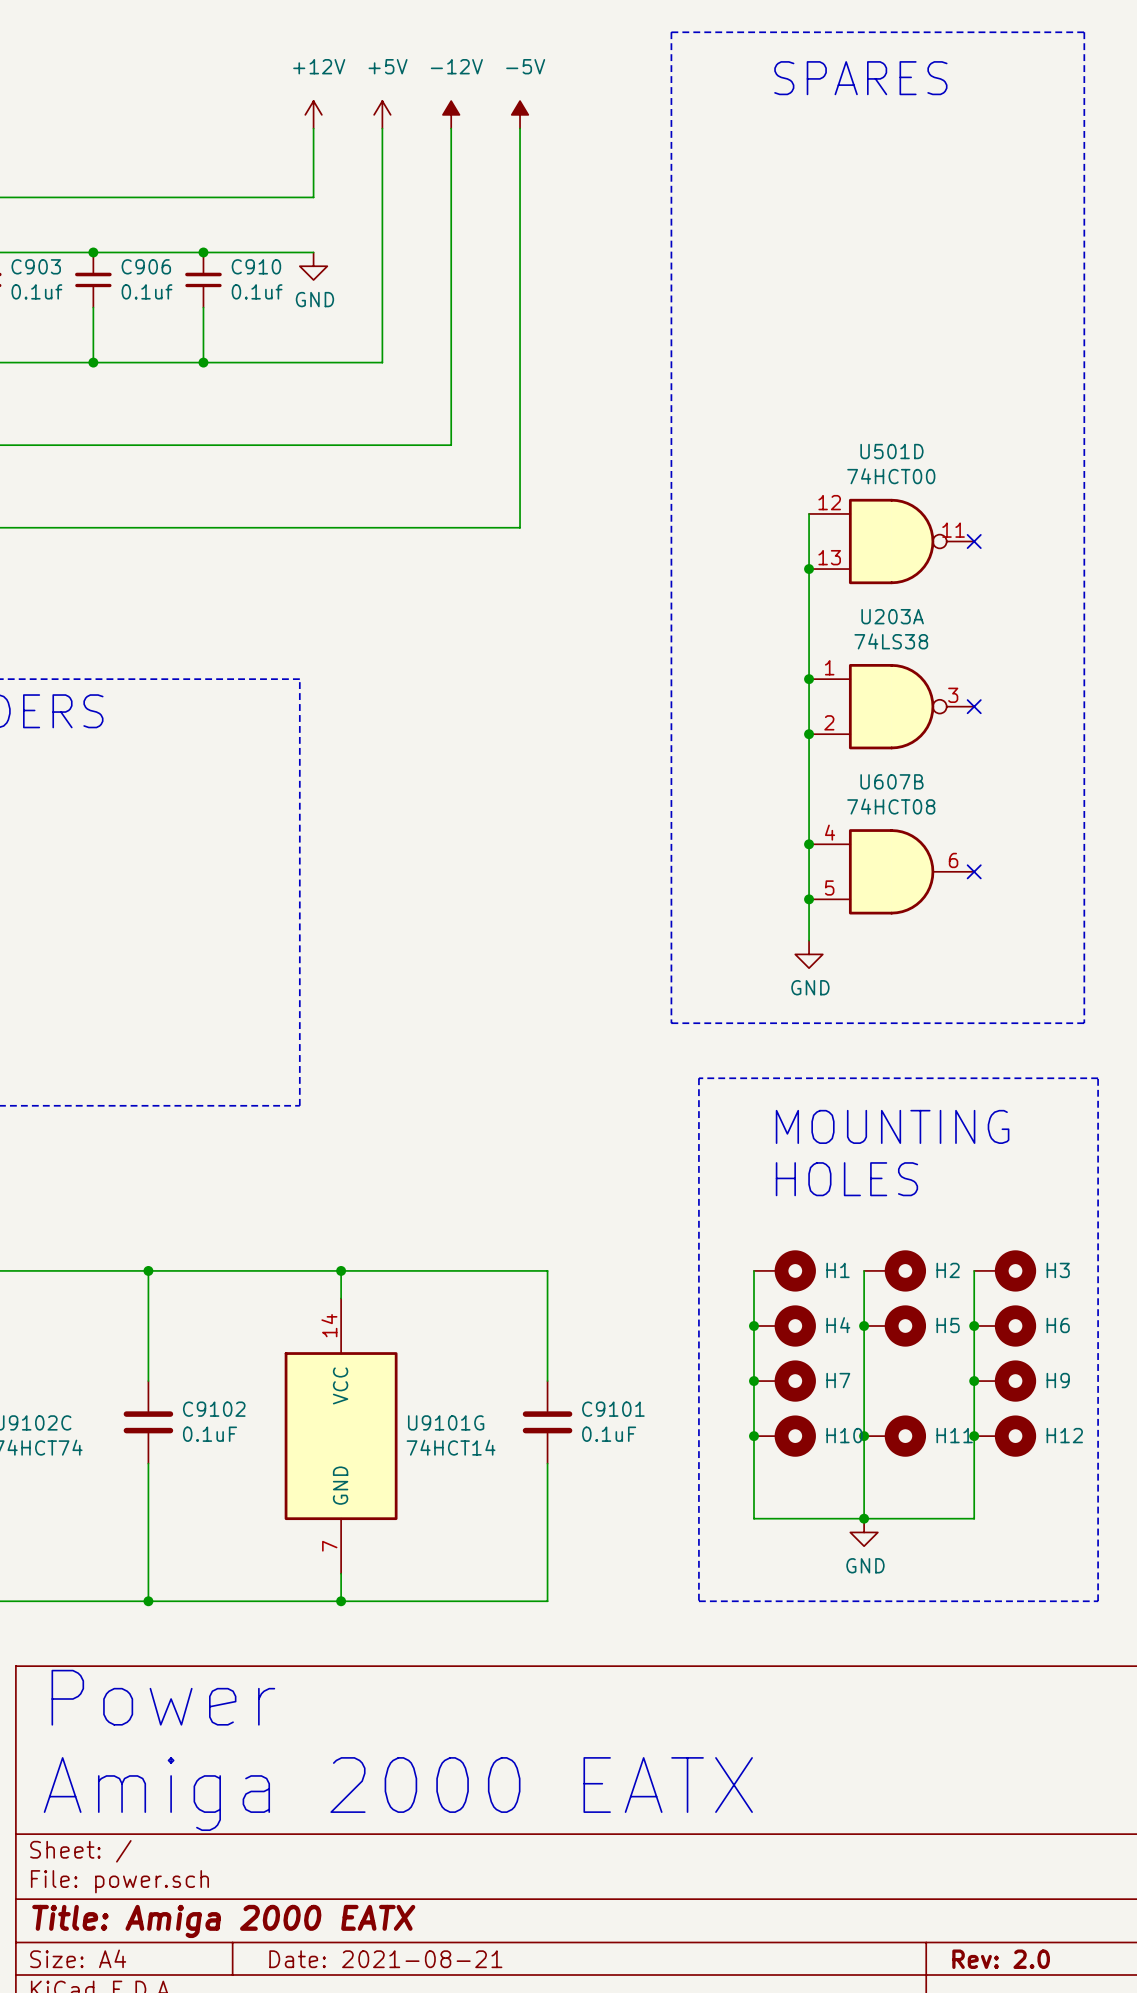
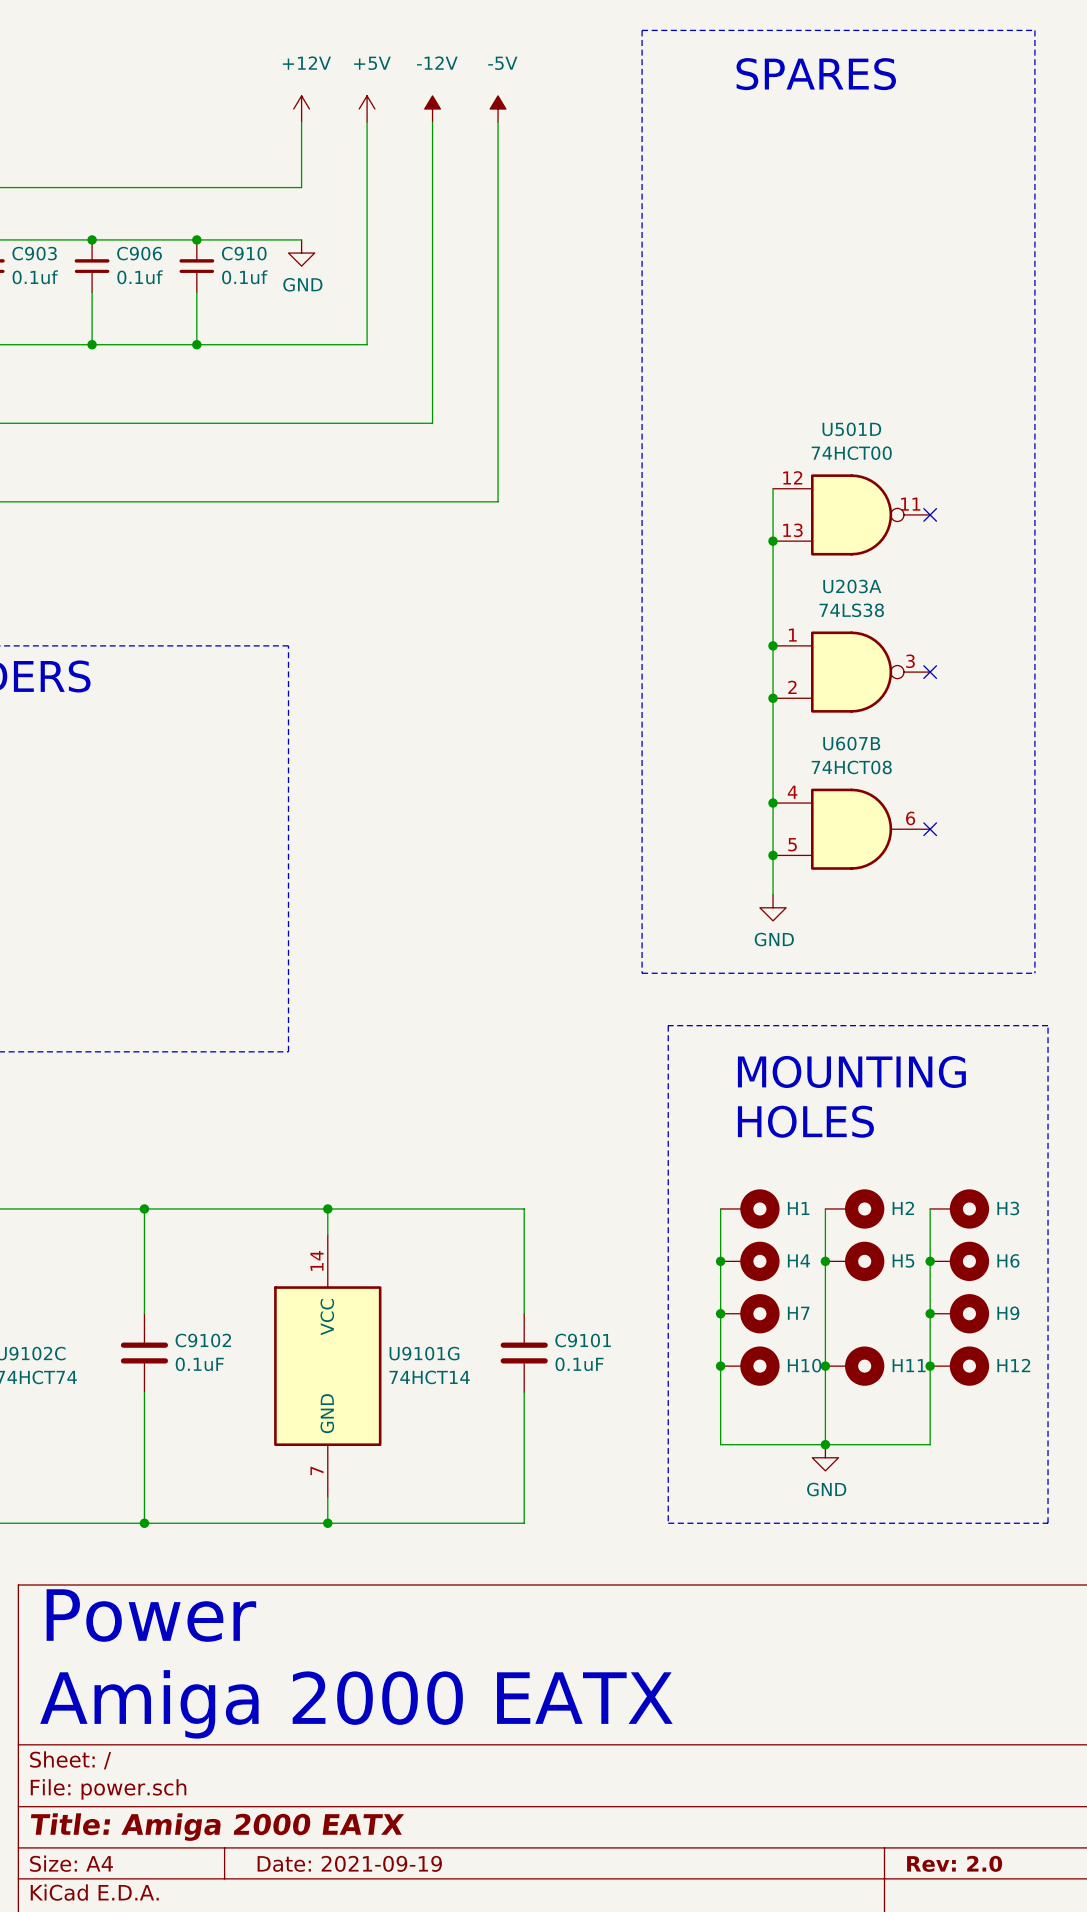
title block: Date: 2021-08-21 (385, 1959) -> Date: 2021-09-19 (349, 1863)

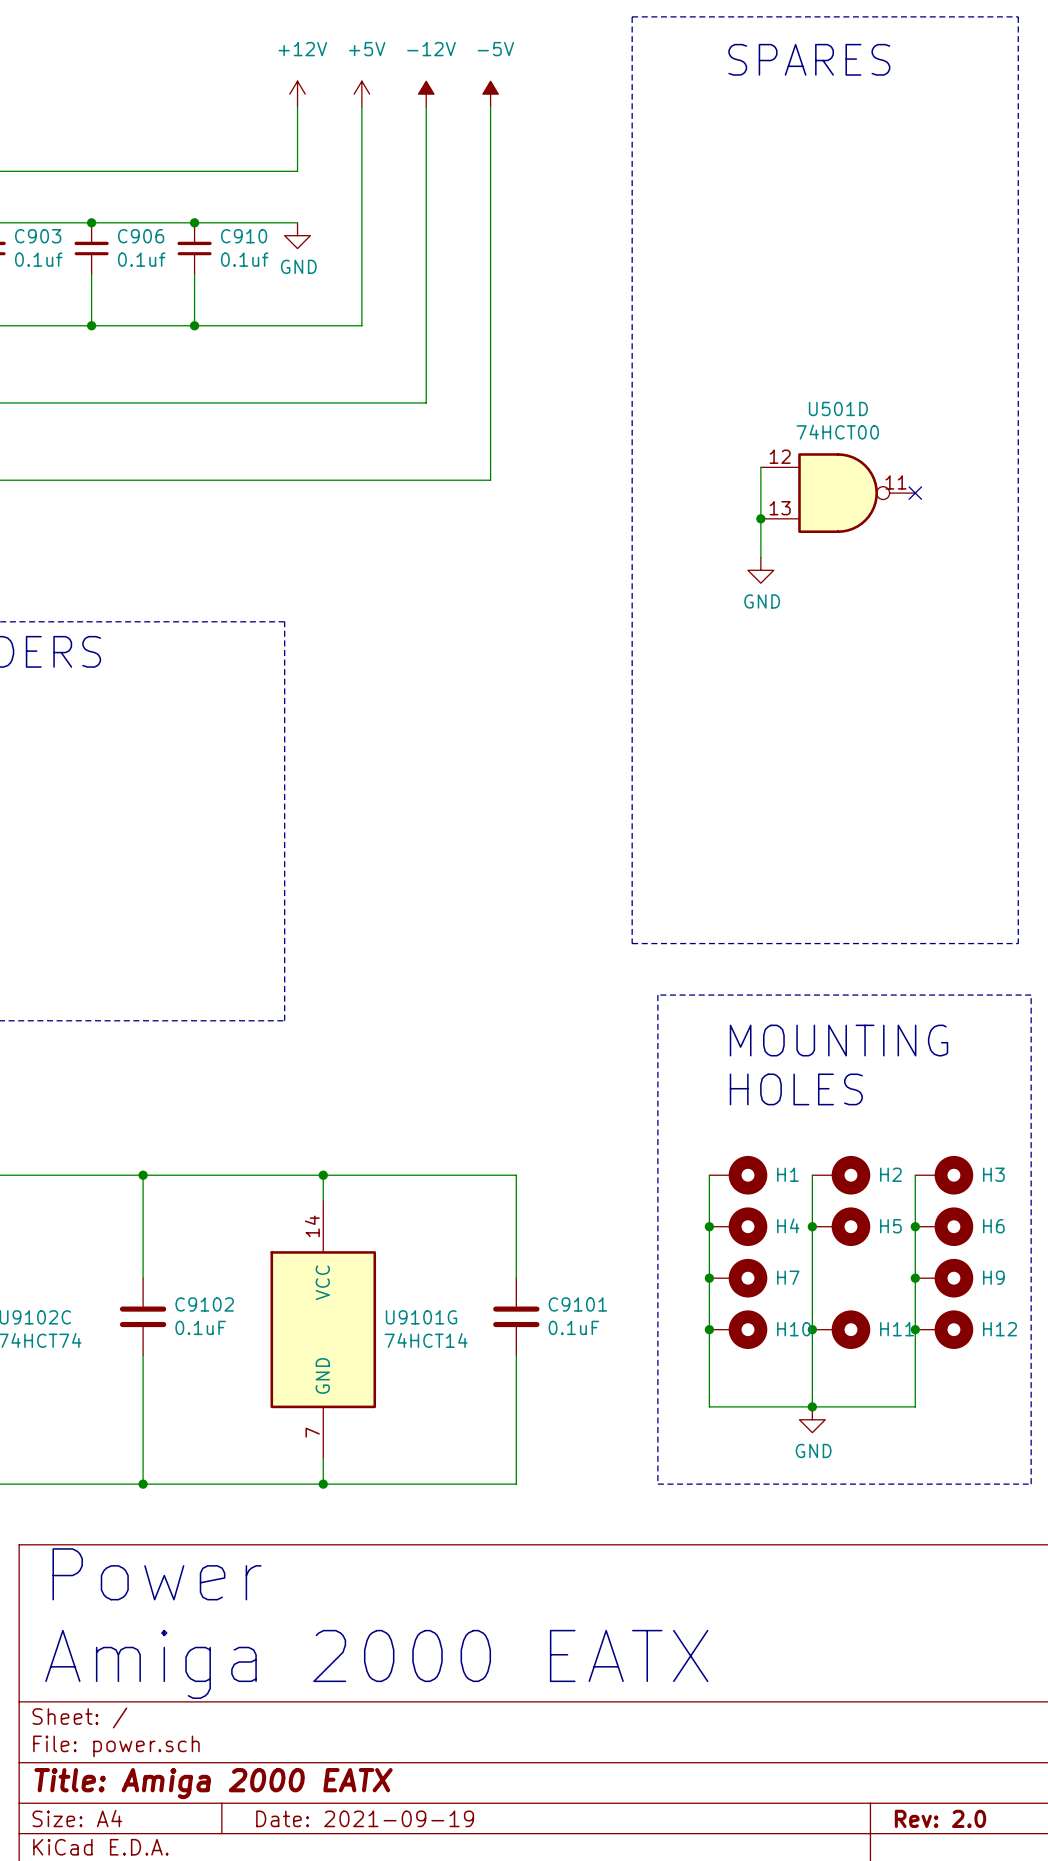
wire: (773, 580) (773, 894) -> none
power symbol: none -> GND (760, 570)
junction: (773, 645) -> none
U203A: 74LS38 (851, 672) -> none
no-connect mark: (930, 672) -> none
junction: (773, 698) -> none
junction: (773, 803) -> none
U607B: 74HCT08 (851, 829) -> none
no-connect mark: (930, 829) -> none
junction: (773, 855) -> none
power symbol: GND (773, 907) -> none

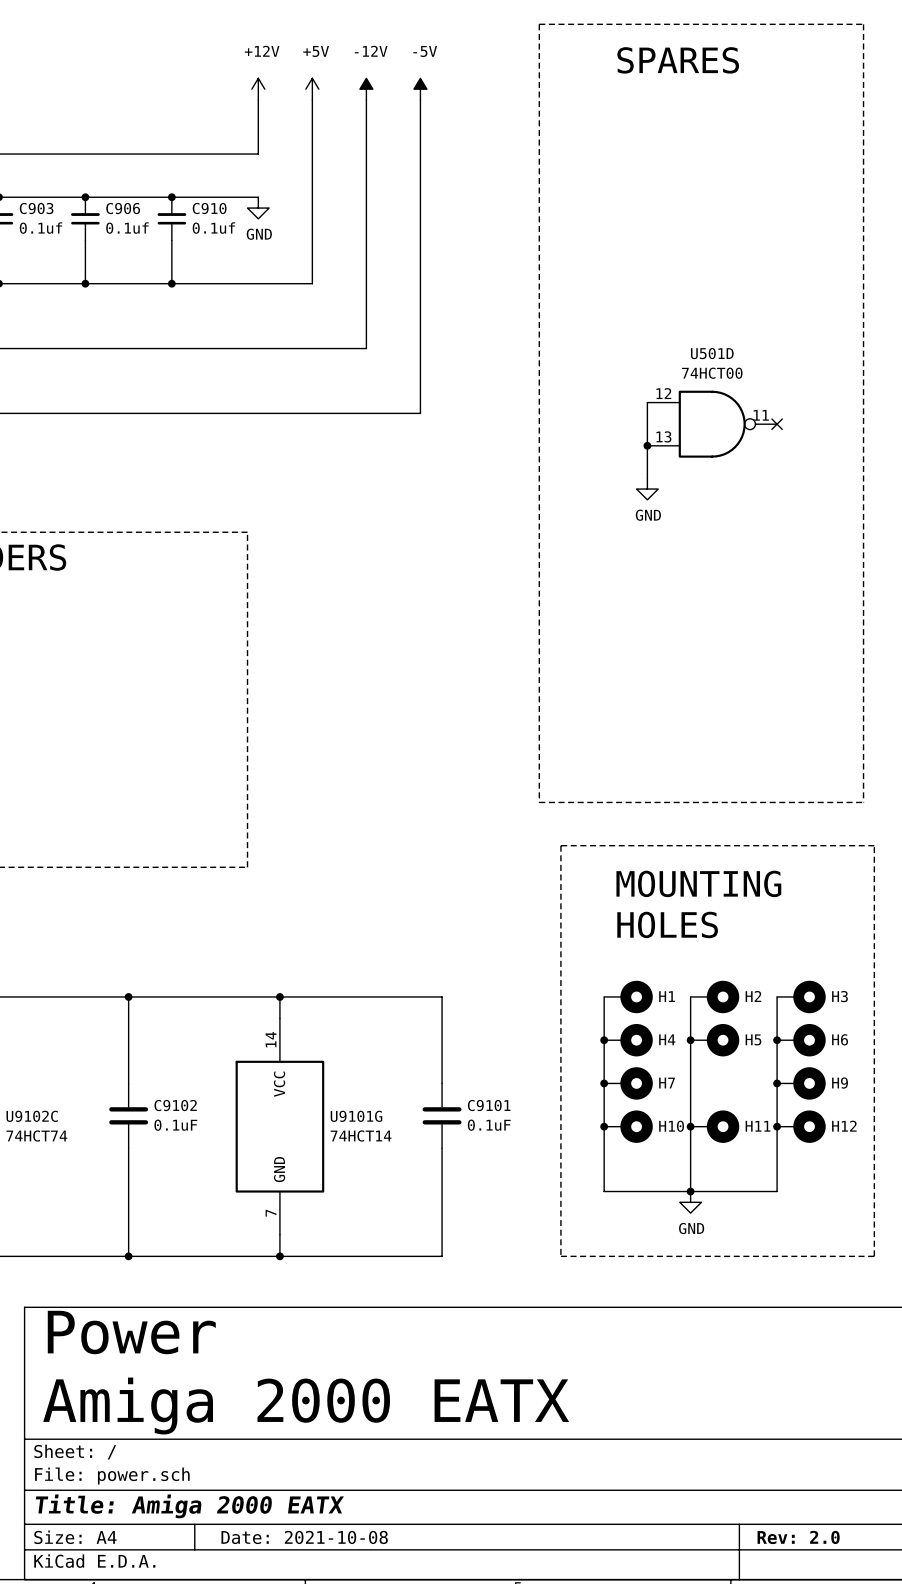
title block: Date: 2021-09-19 (365, 1818) -> Date: 2021-10-08 (304, 1537)

